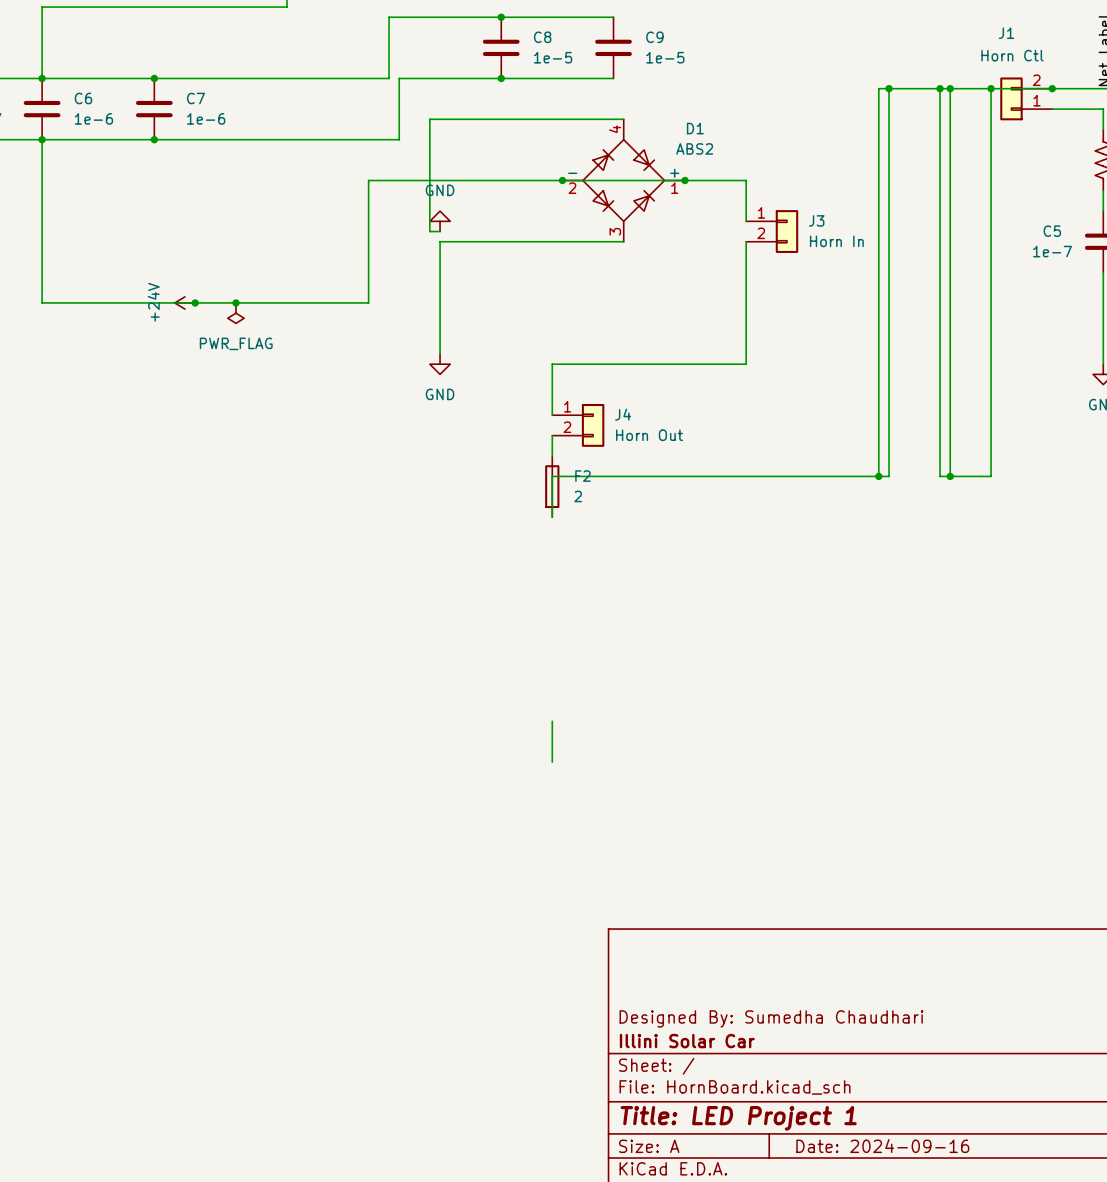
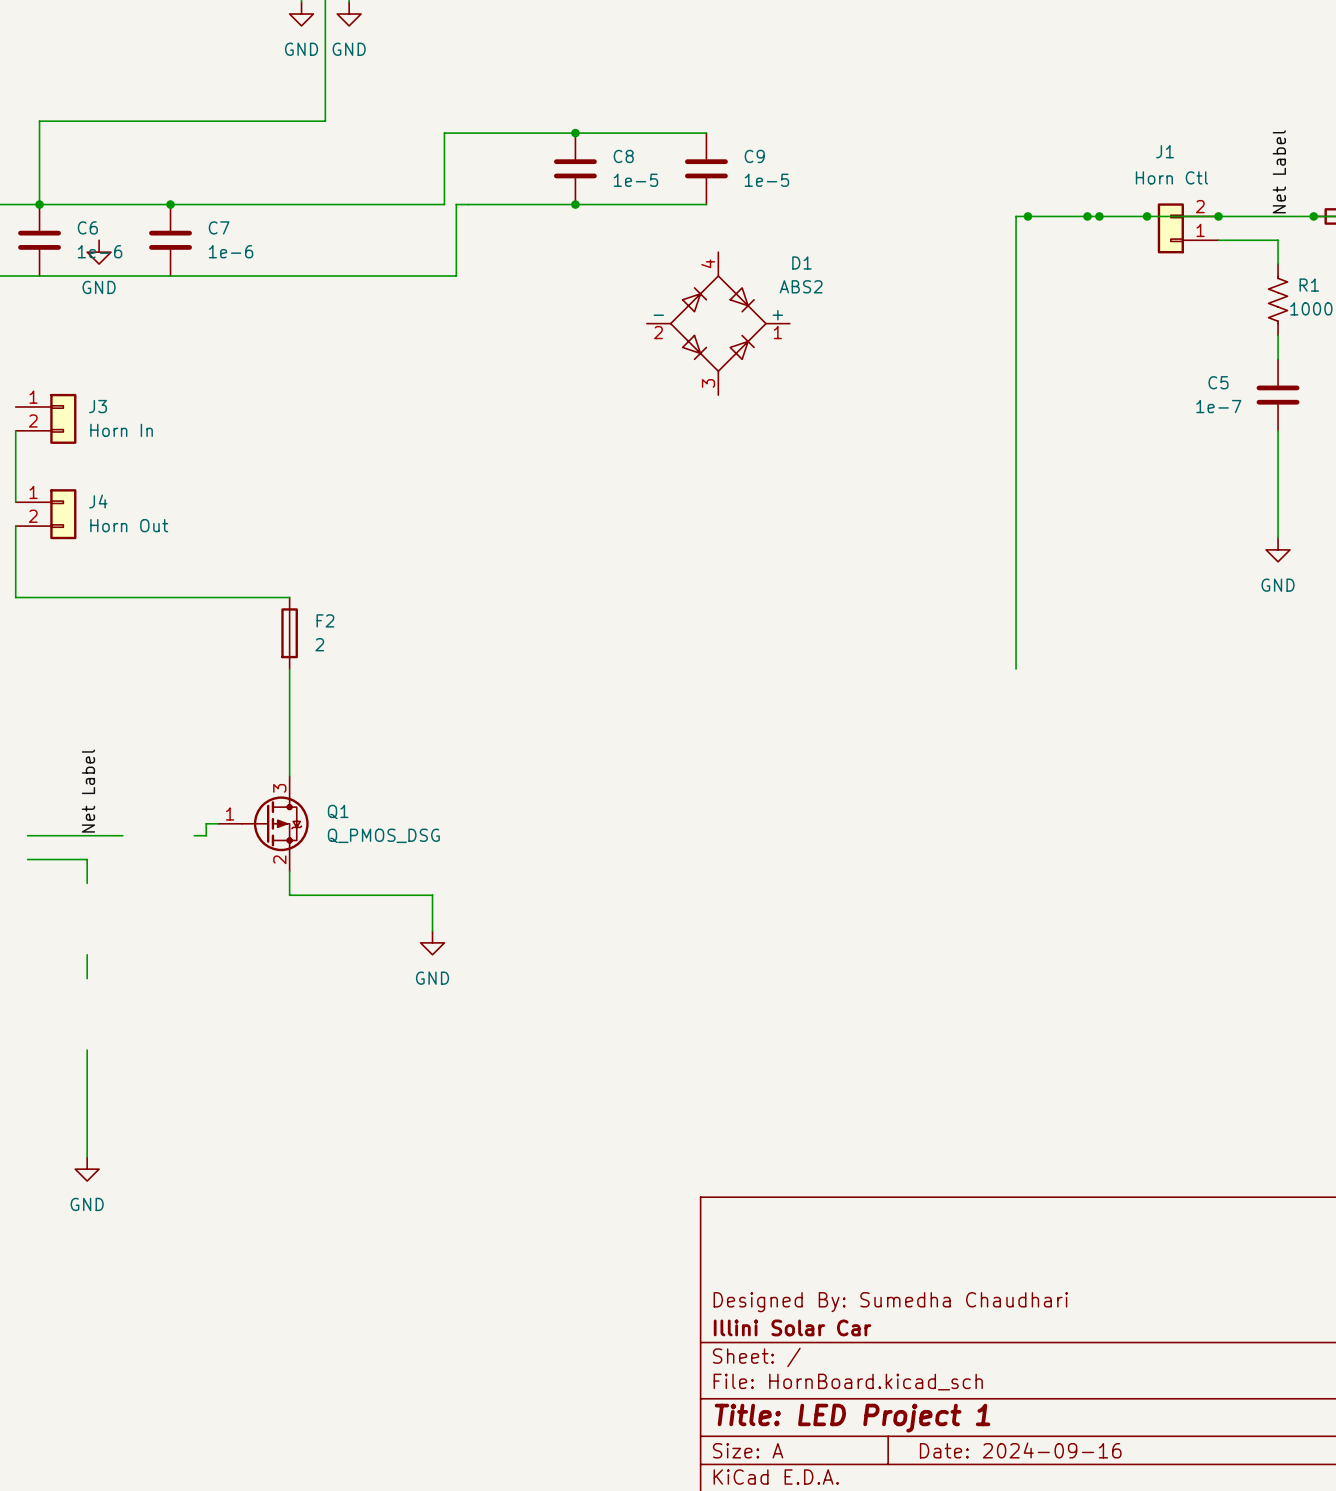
wire: (889, 88) (889, 476) (552, 476) (552, 517) -> none
wire: (940, 88) (940, 476) (991, 476) (991, 88) -> none
wire: (950, 88) (950, 476) -> none
power symbol: none -> GND (99, 252)
wire: (623, 119) (429, 119) (429, 231) (440, 231) -> none
wire: (42, 139) (42, 302) (368, 302) (368, 180) (746, 180) (746, 221) -> none
junction: (42, 139) -> none
junction: (154, 139) -> none
junction: (562, 180) -> none
junction: (684, 180) -> none
power symbol: GND (440, 221) -> none
J3 position: (772, 231) -> (46, 418)
wire: (623, 241) (440, 241) (440, 353) -> none
wire: (746, 241) (746, 364) (552, 364) (552, 415) -> none
wire: none -> (15, 430) (15, 502)
power symbol: +24V (184, 302) -> none
junction: (195, 302) -> none
junction: (235, 302) -> none
power symbol: PWR_FLAG (235, 313) -> none
wire: none -> (15, 526) (15, 597) (289, 597)
power symbol: GND (440, 364) -> none
J4 position: (578, 425) -> (46, 514)
wire: (552, 435) (552, 456) -> none
wire: none -> (289, 668) (289, 776)
junction: (878, 476) -> none
junction: (950, 476) -> none
F2 position: (552, 486) -> (289, 633)
label: none -> Net Label (88, 791)
wire: none -> (218, 823) (206, 823) (206, 835) (194, 835)
Q1: none -> Q_PMOS_DSG (263, 823)
wire: none -> (27, 835) (122, 835)
wire: none -> (27, 859) (87, 859) (87, 883)
wire: none -> (289, 871) (289, 895) (432, 895) (432, 930)
power symbol: none -> GND (432, 942)
wire: none -> (87, 954) (87, 978)
wire: (552, 721) (552, 762) -> none
wire: none -> (87, 1050) (87, 1157)
power symbol: none -> GND (87, 1169)

